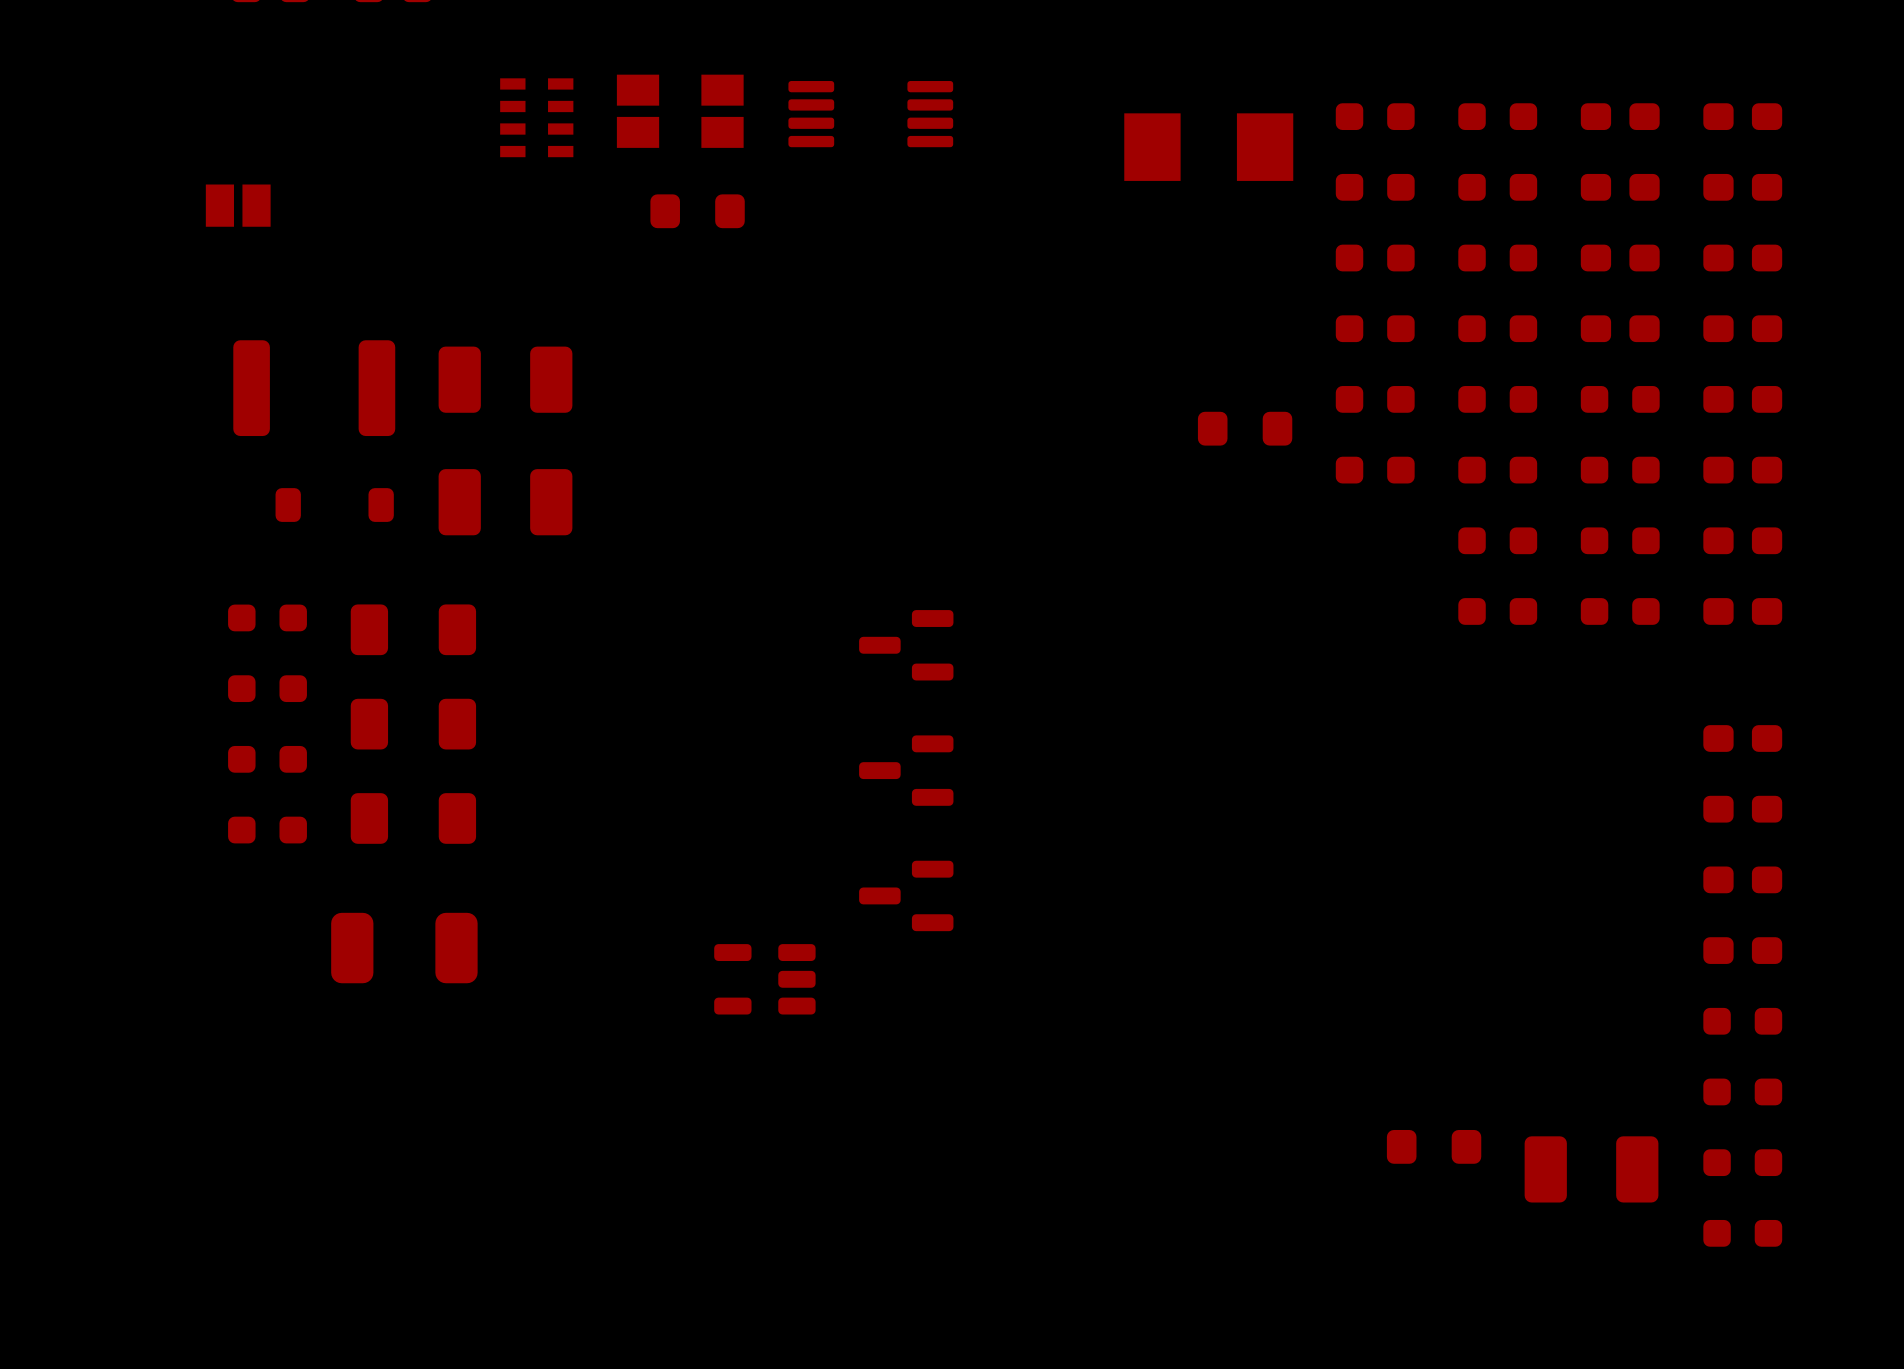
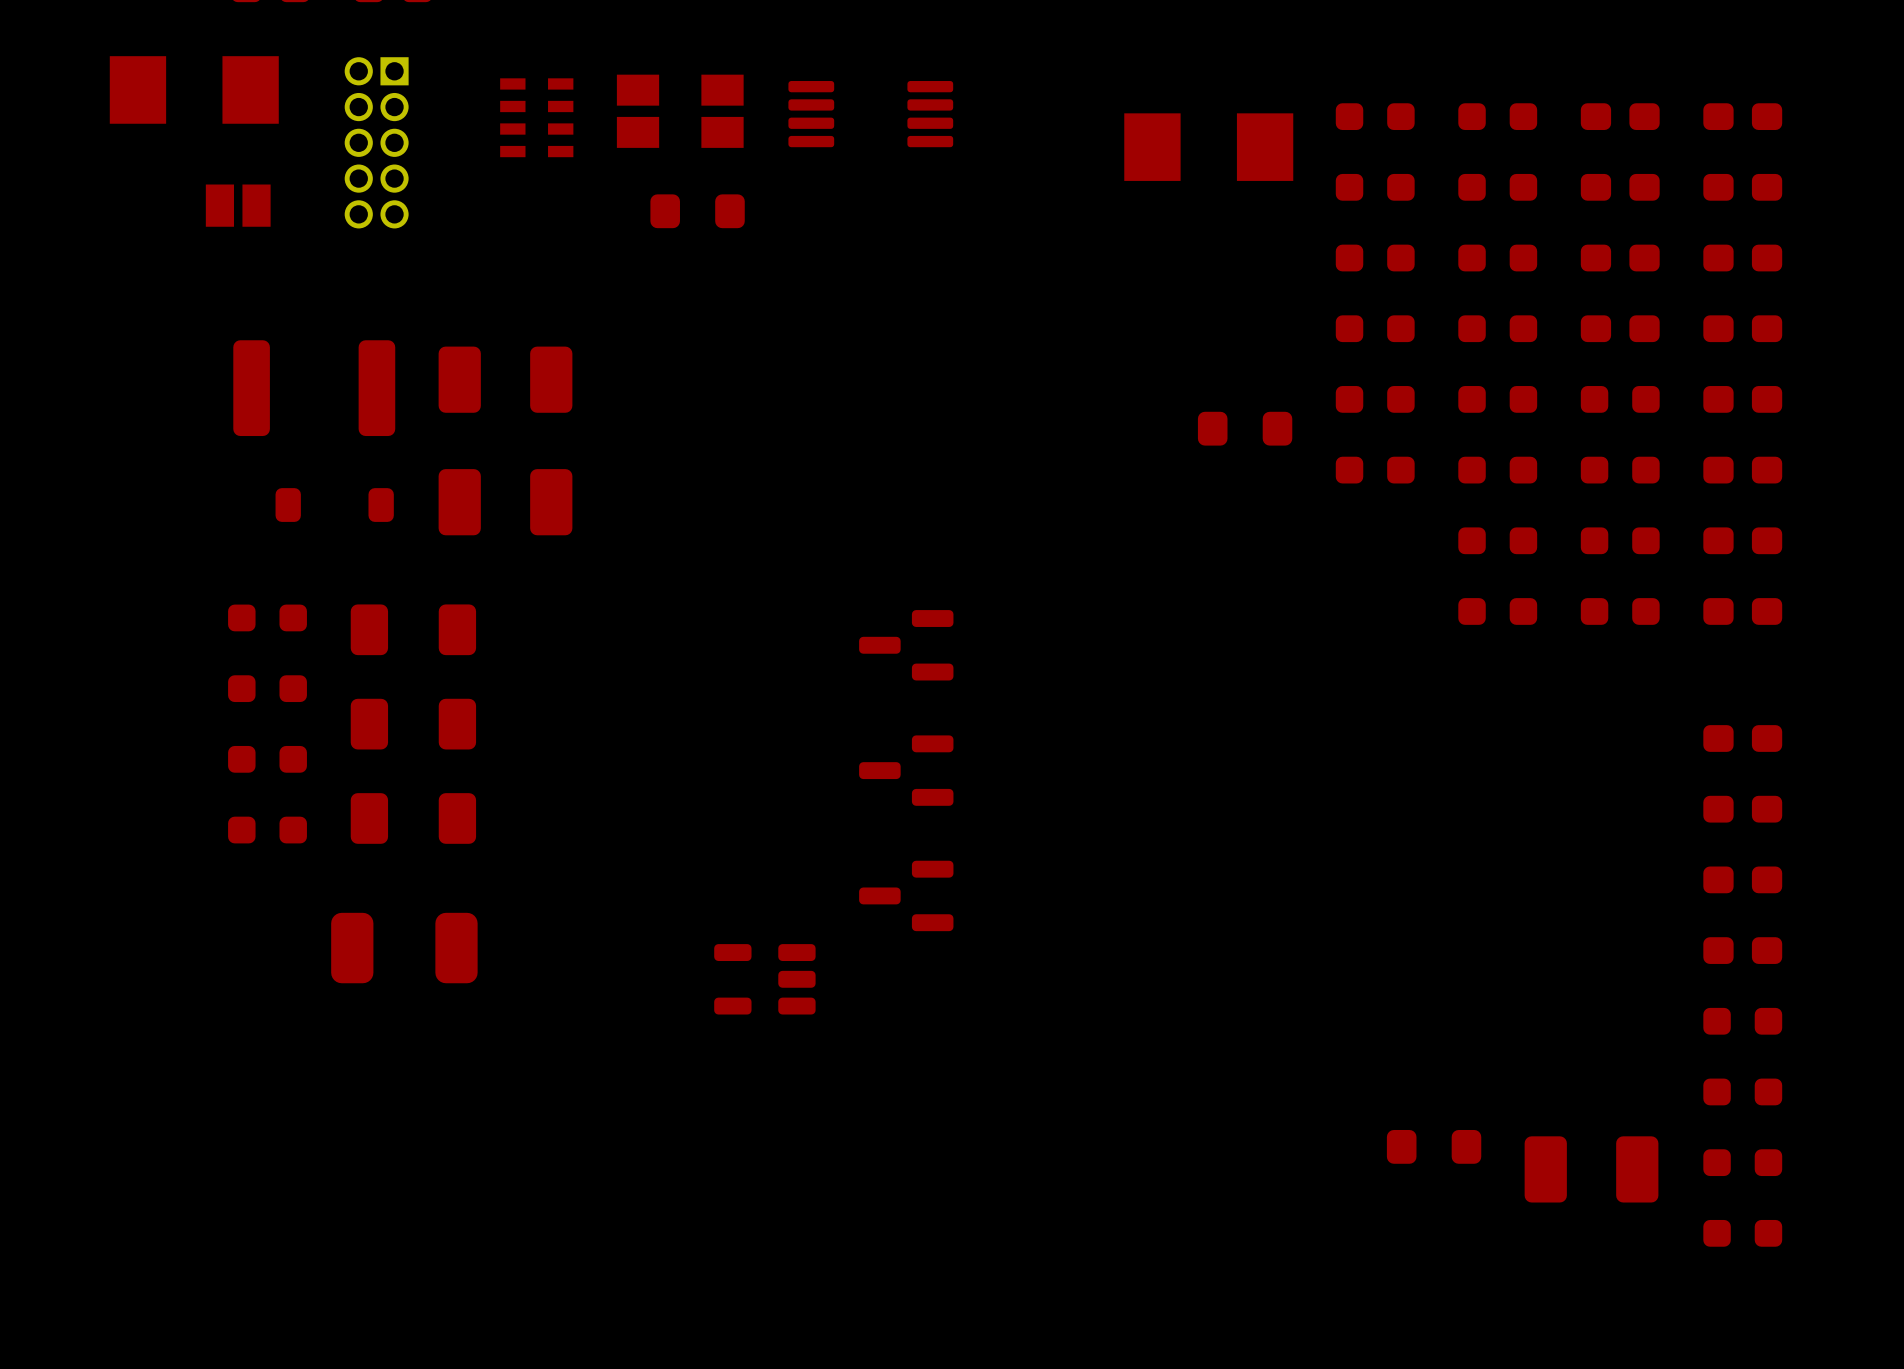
part: none -> (194, 89)
part: none -> (376, 142)

